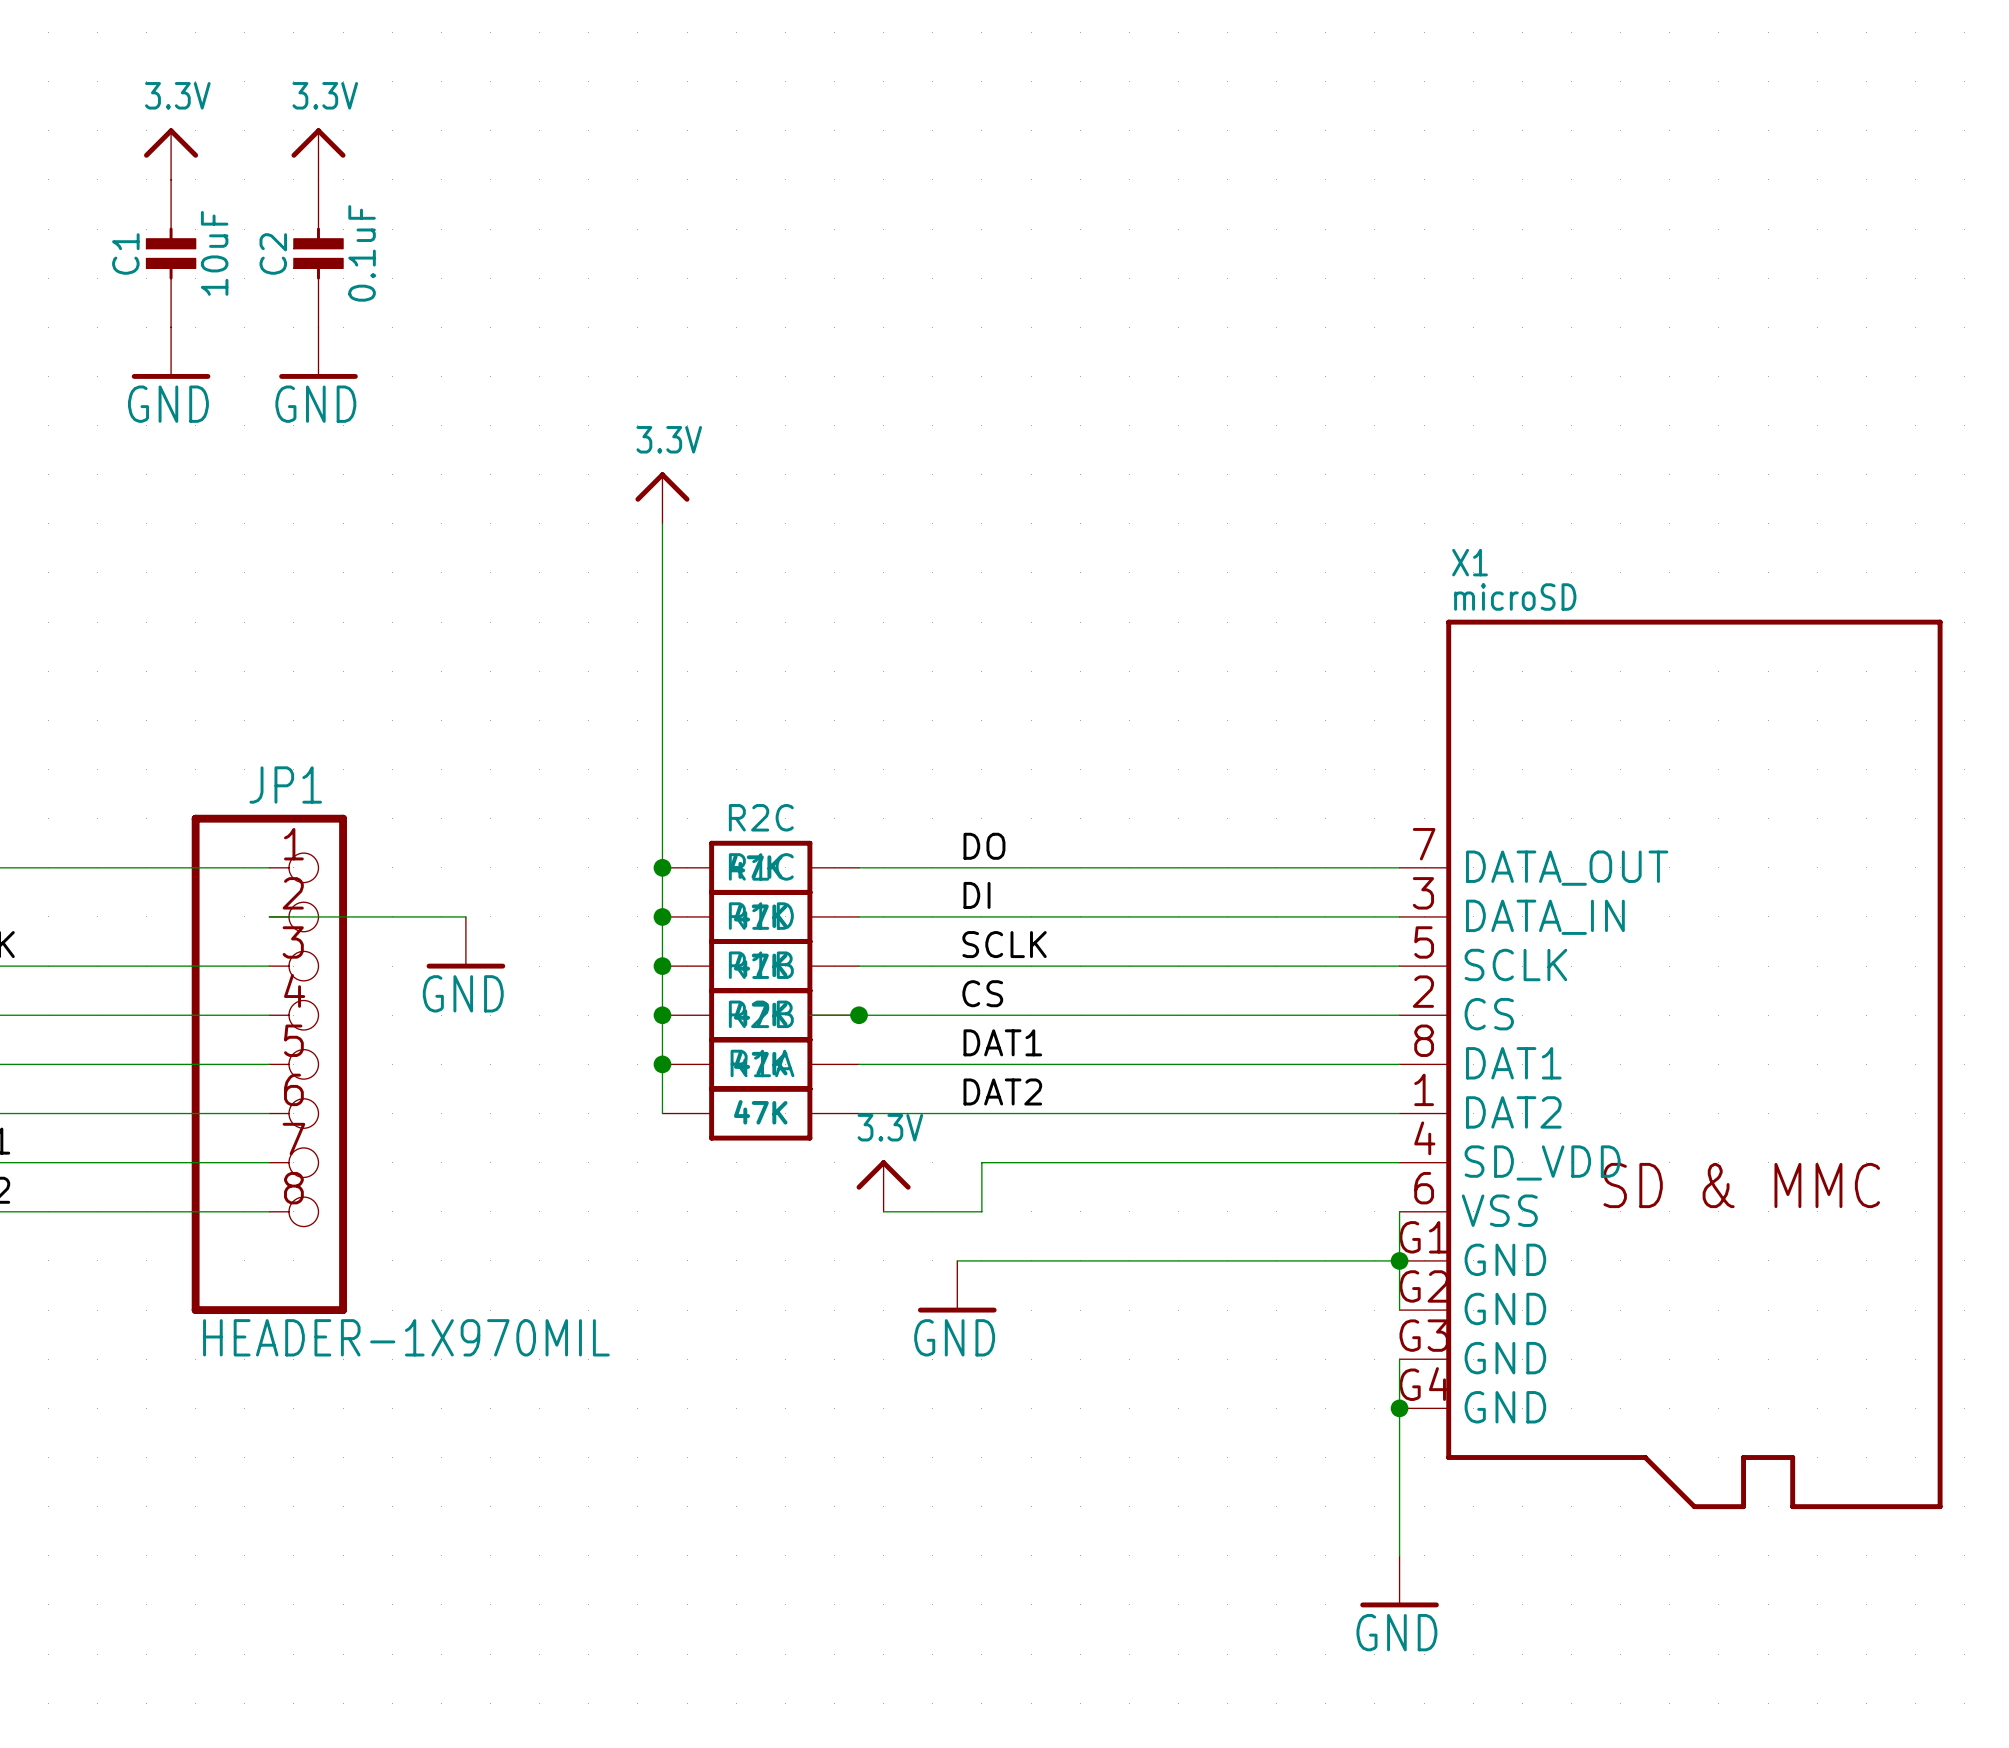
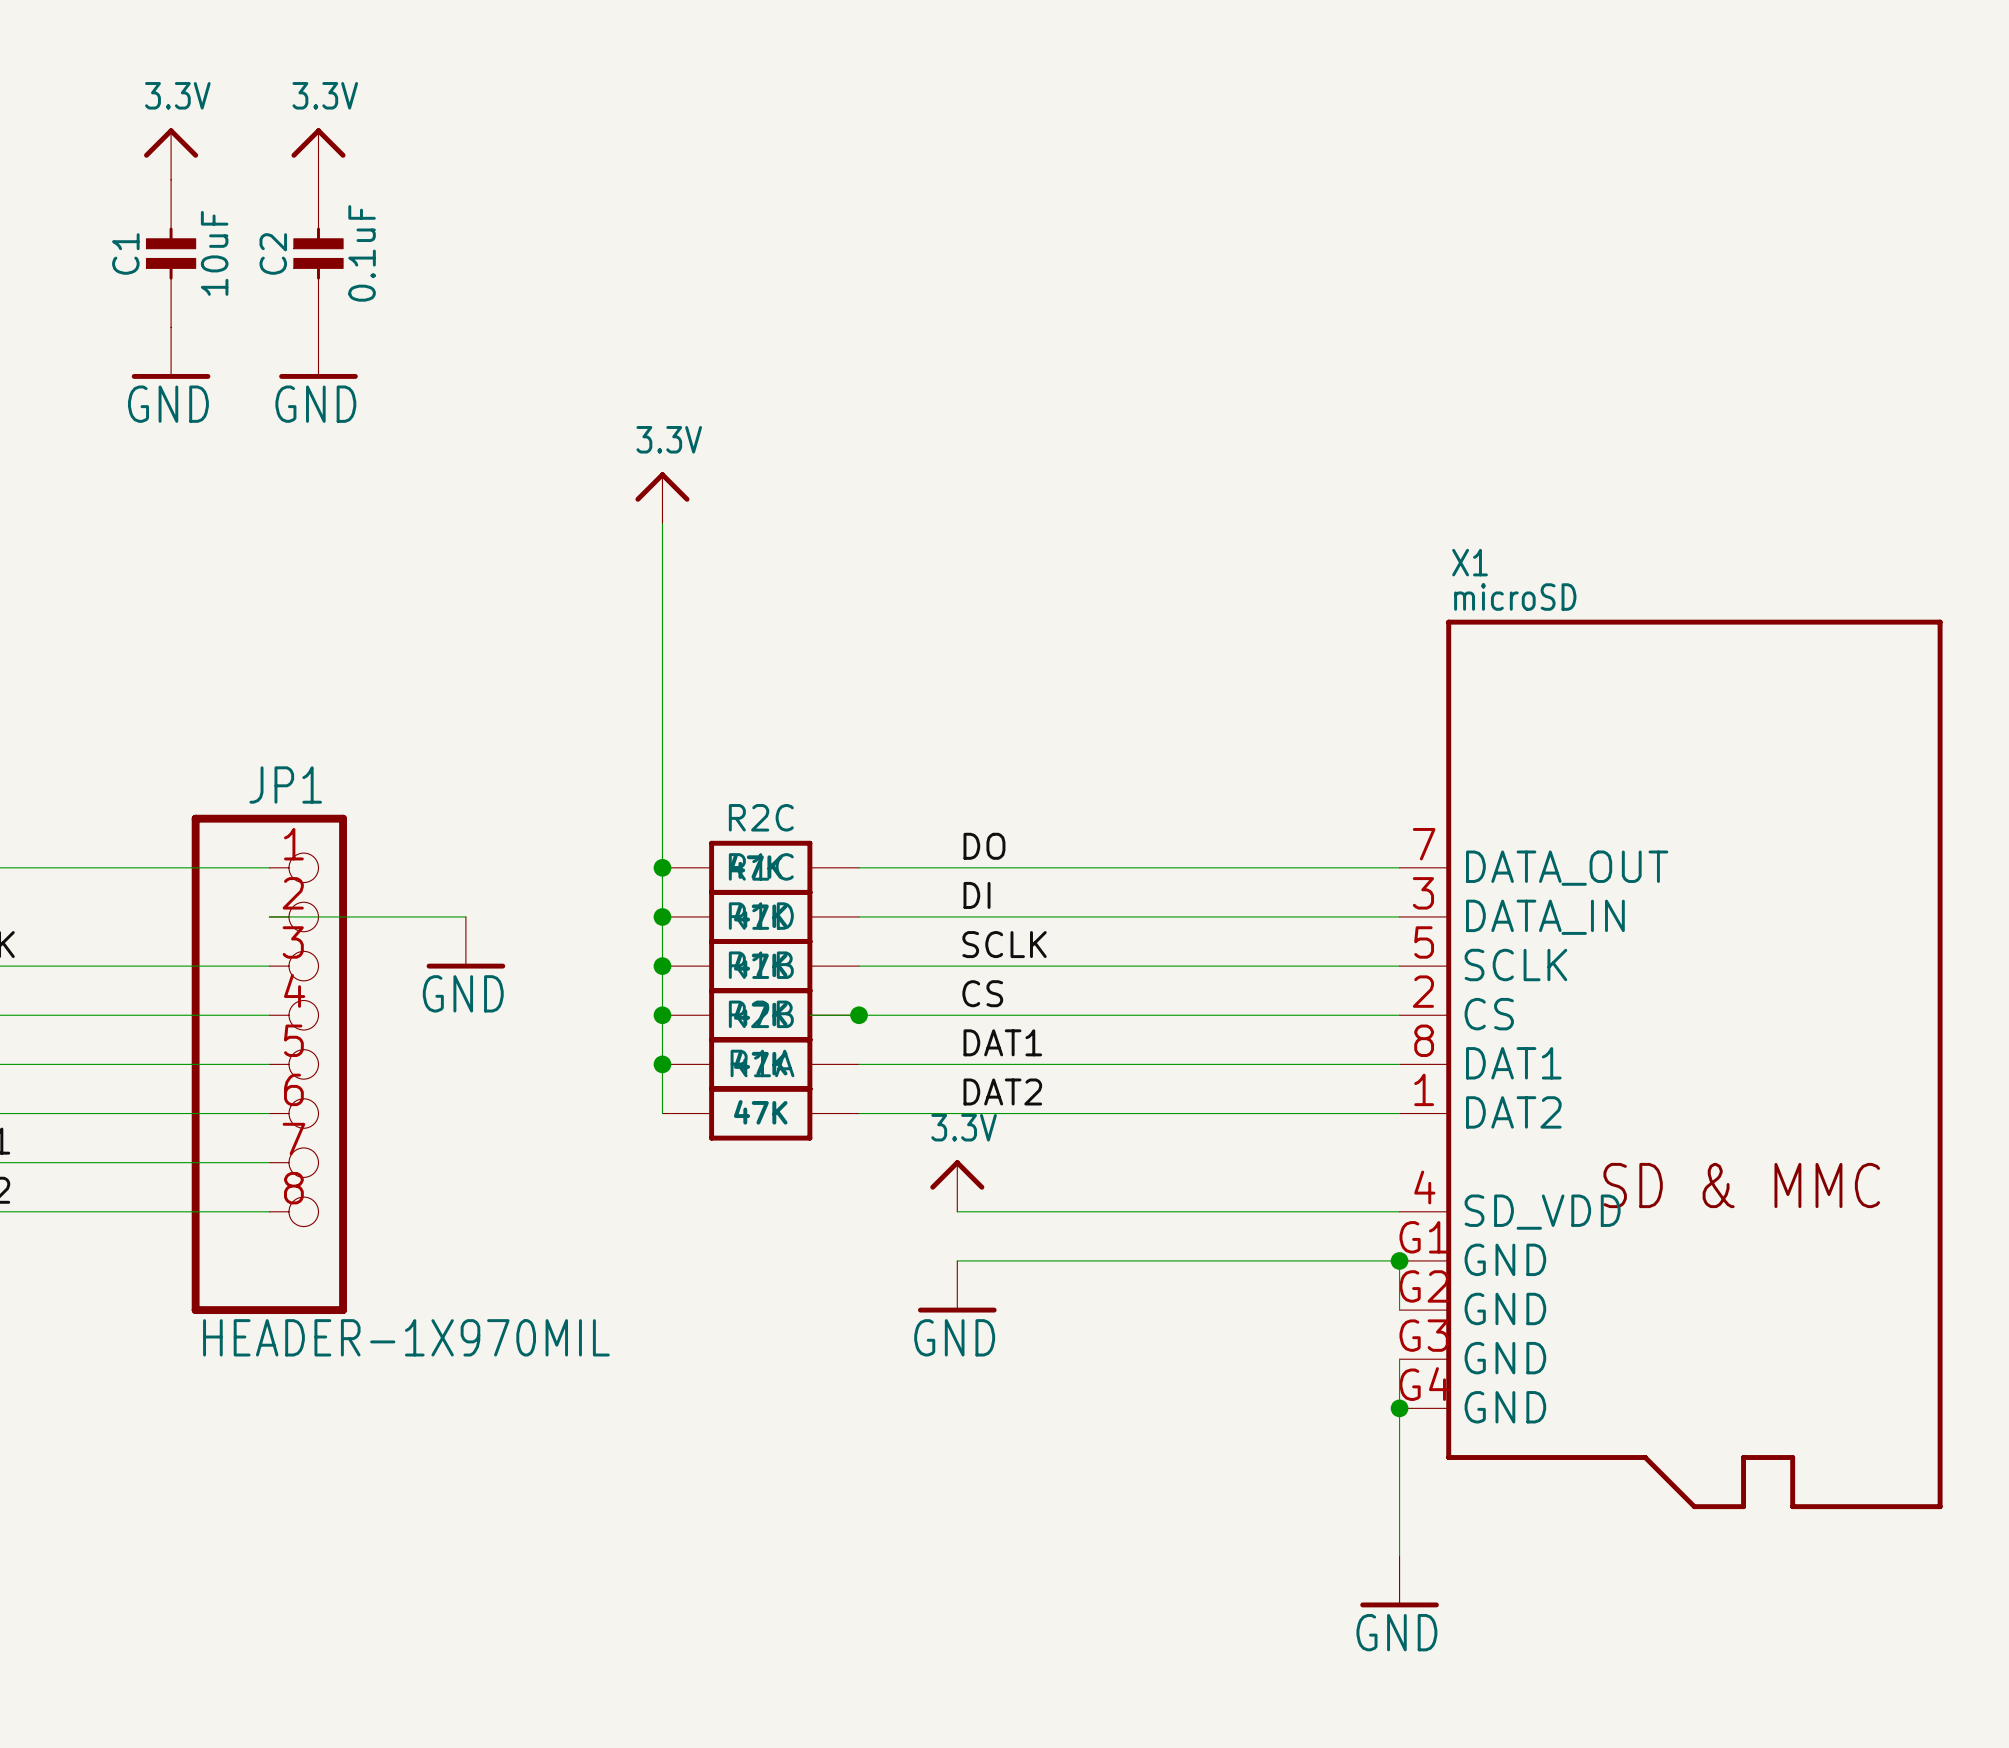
X1 symbol: [1399, 619, 1943, 1510] -> [1399, 619, 1943, 1510]
wire: (1399, 1162) (981, 1162) (981, 1211) -> (1399, 1211) (981, 1211)
power symbol position: 3.3V (883, 1186) -> 3.3V (957, 1186)
wire: (883, 1211) (957, 1211) -> none
wire: (1399, 1211) (1399, 1260) -> none

